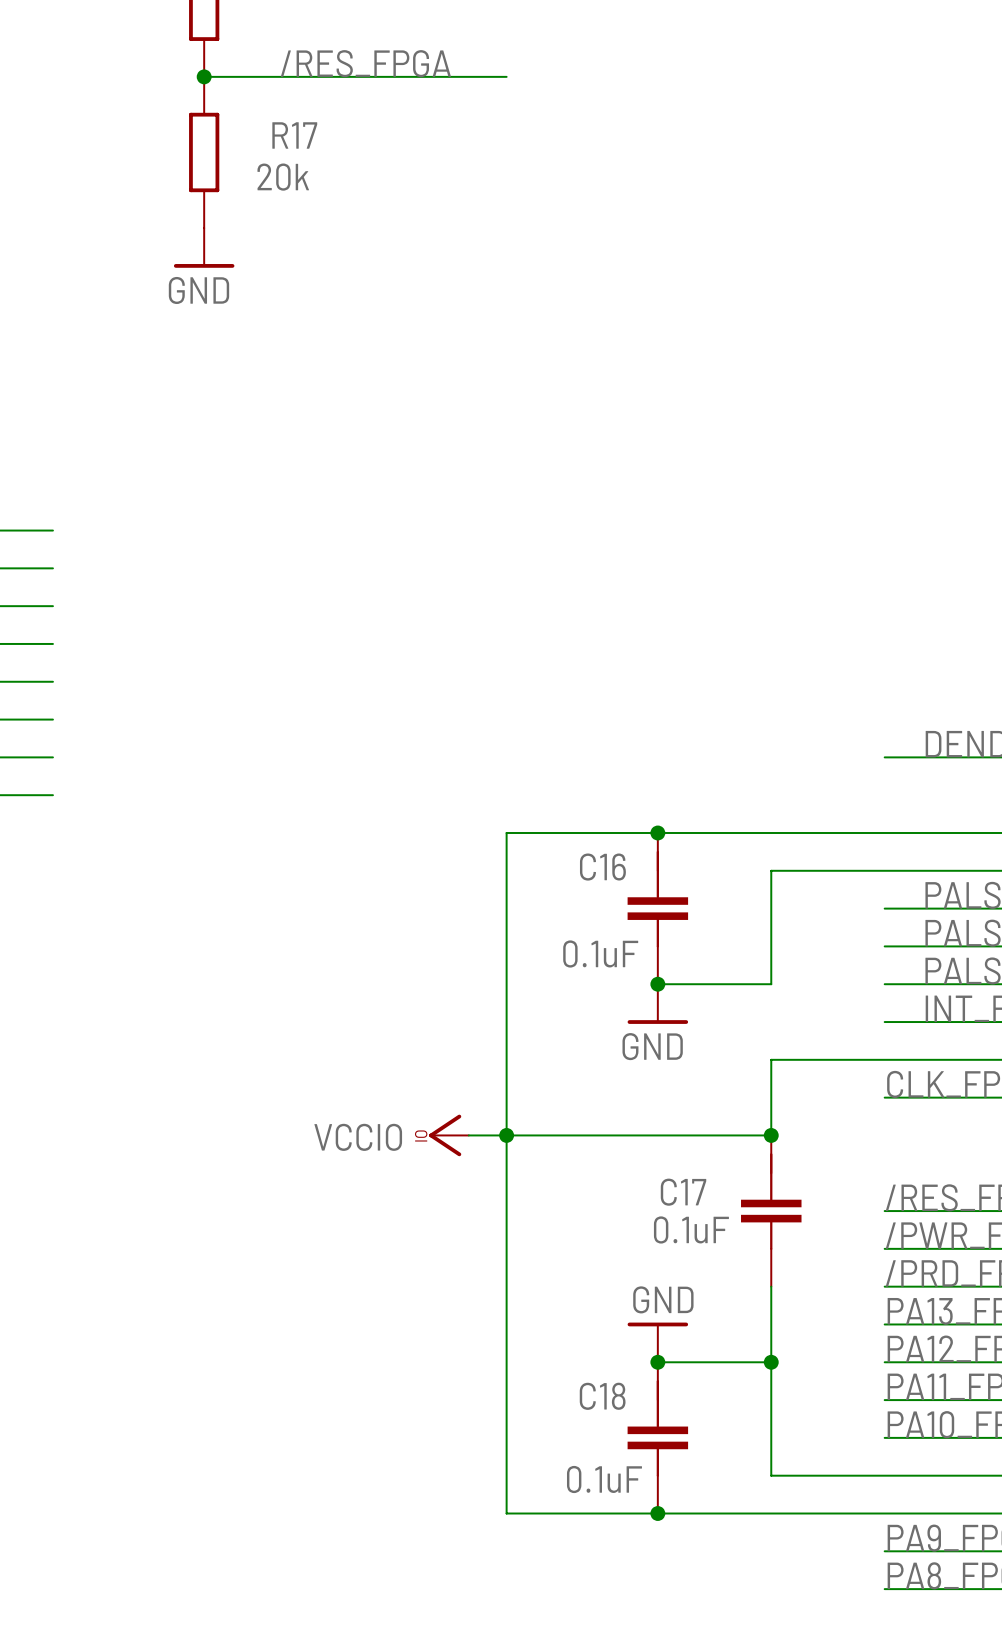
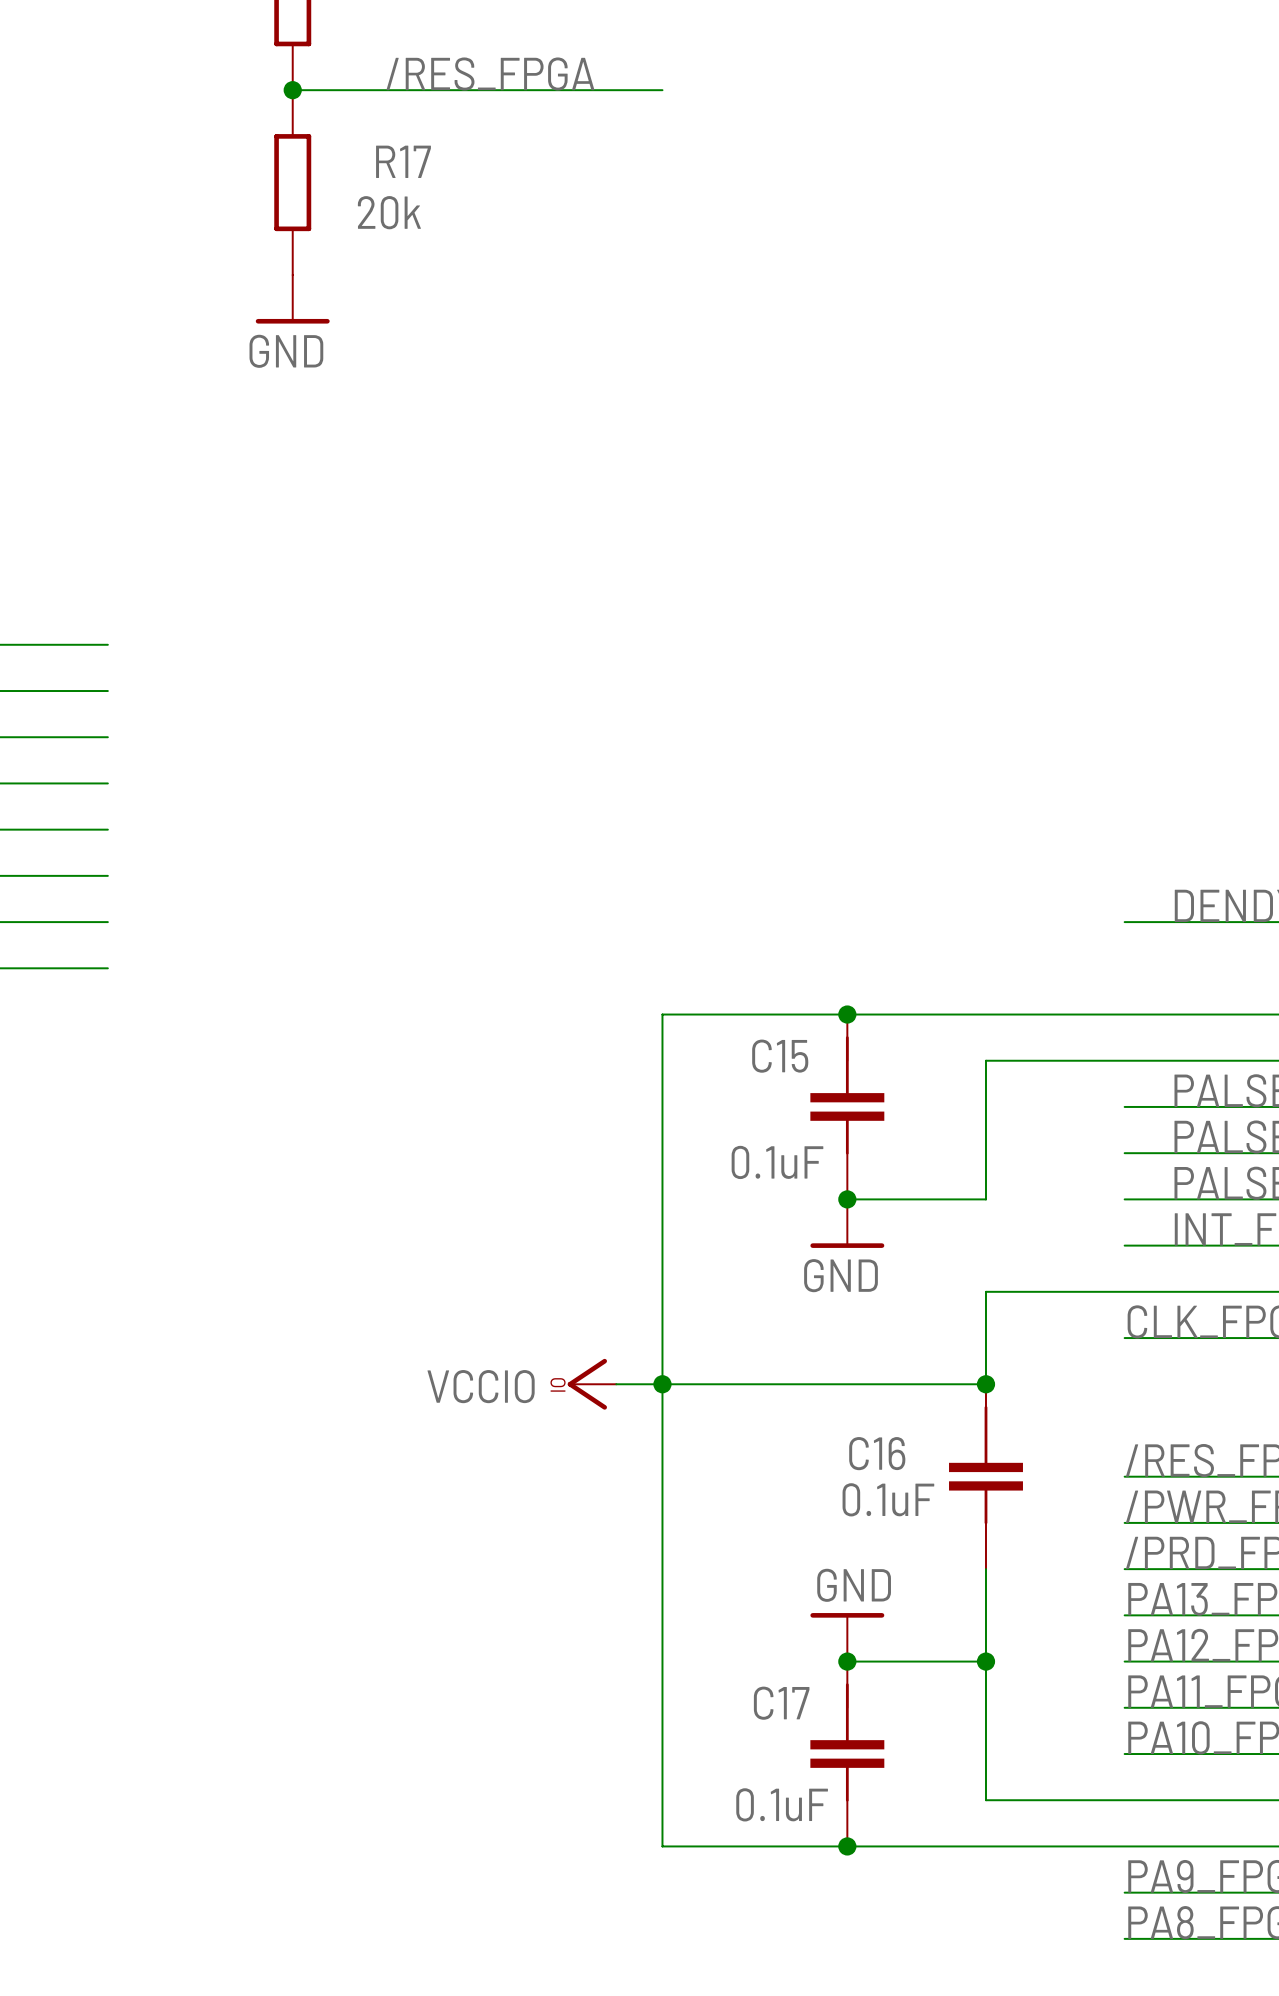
C16 name: C16 (602, 867) -> C15 (780, 1056)
C17 name: C17 (683, 1192) -> C16 (877, 1453)
C18 name: C18 (602, 1396) -> C17 (781, 1703)

